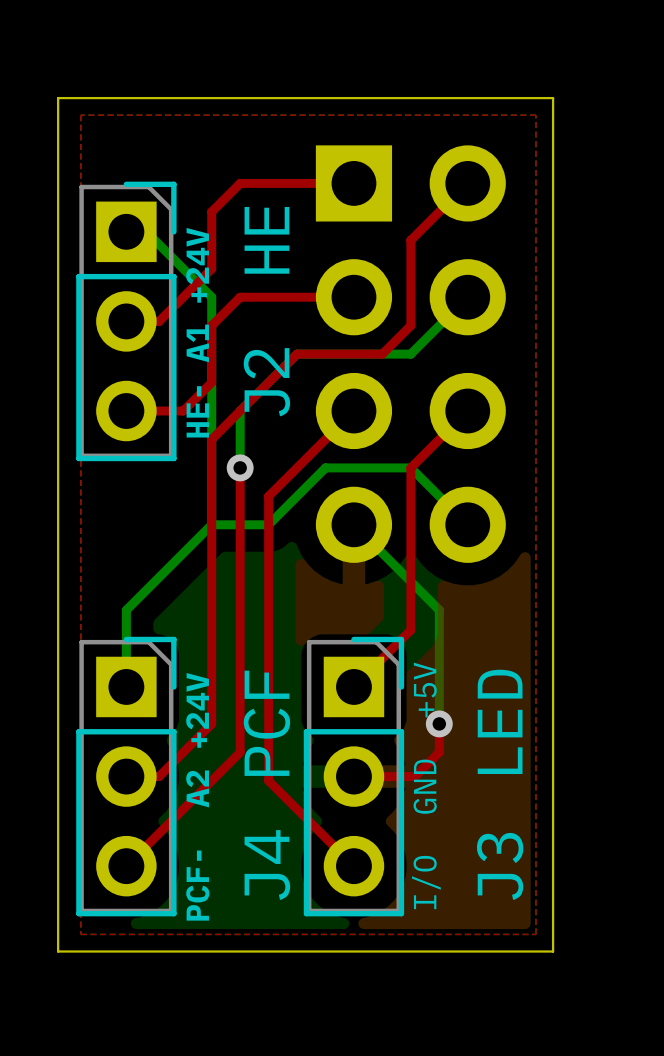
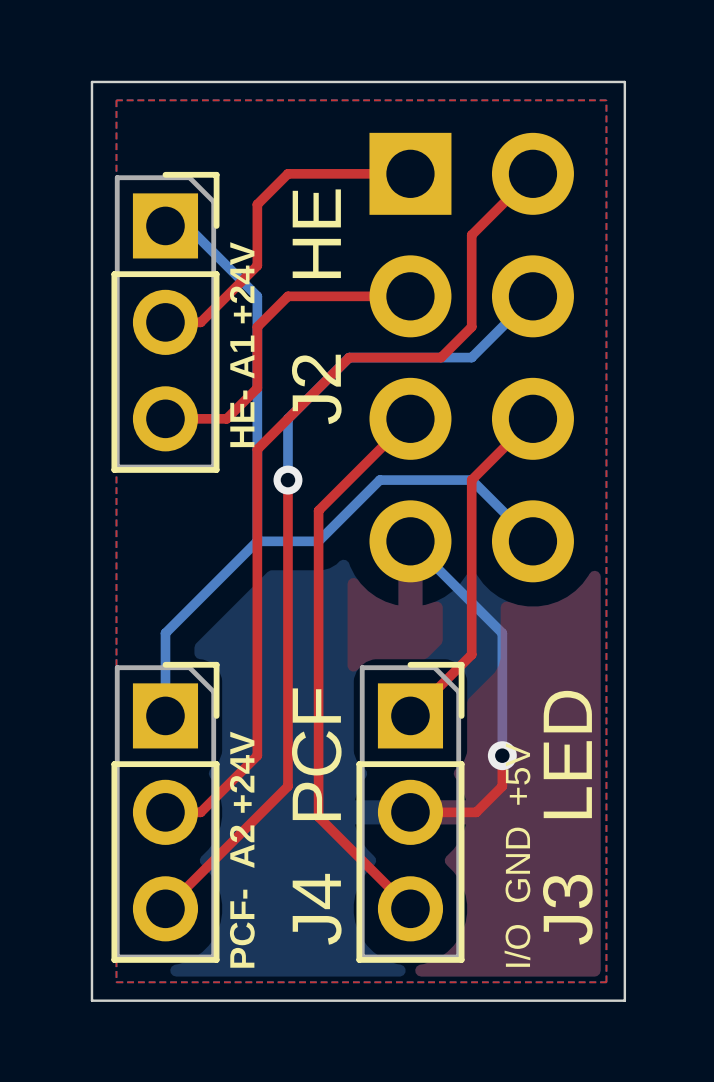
text position: I/O GND +5V (426, 785) -> I/O GND +5V (517, 855)

